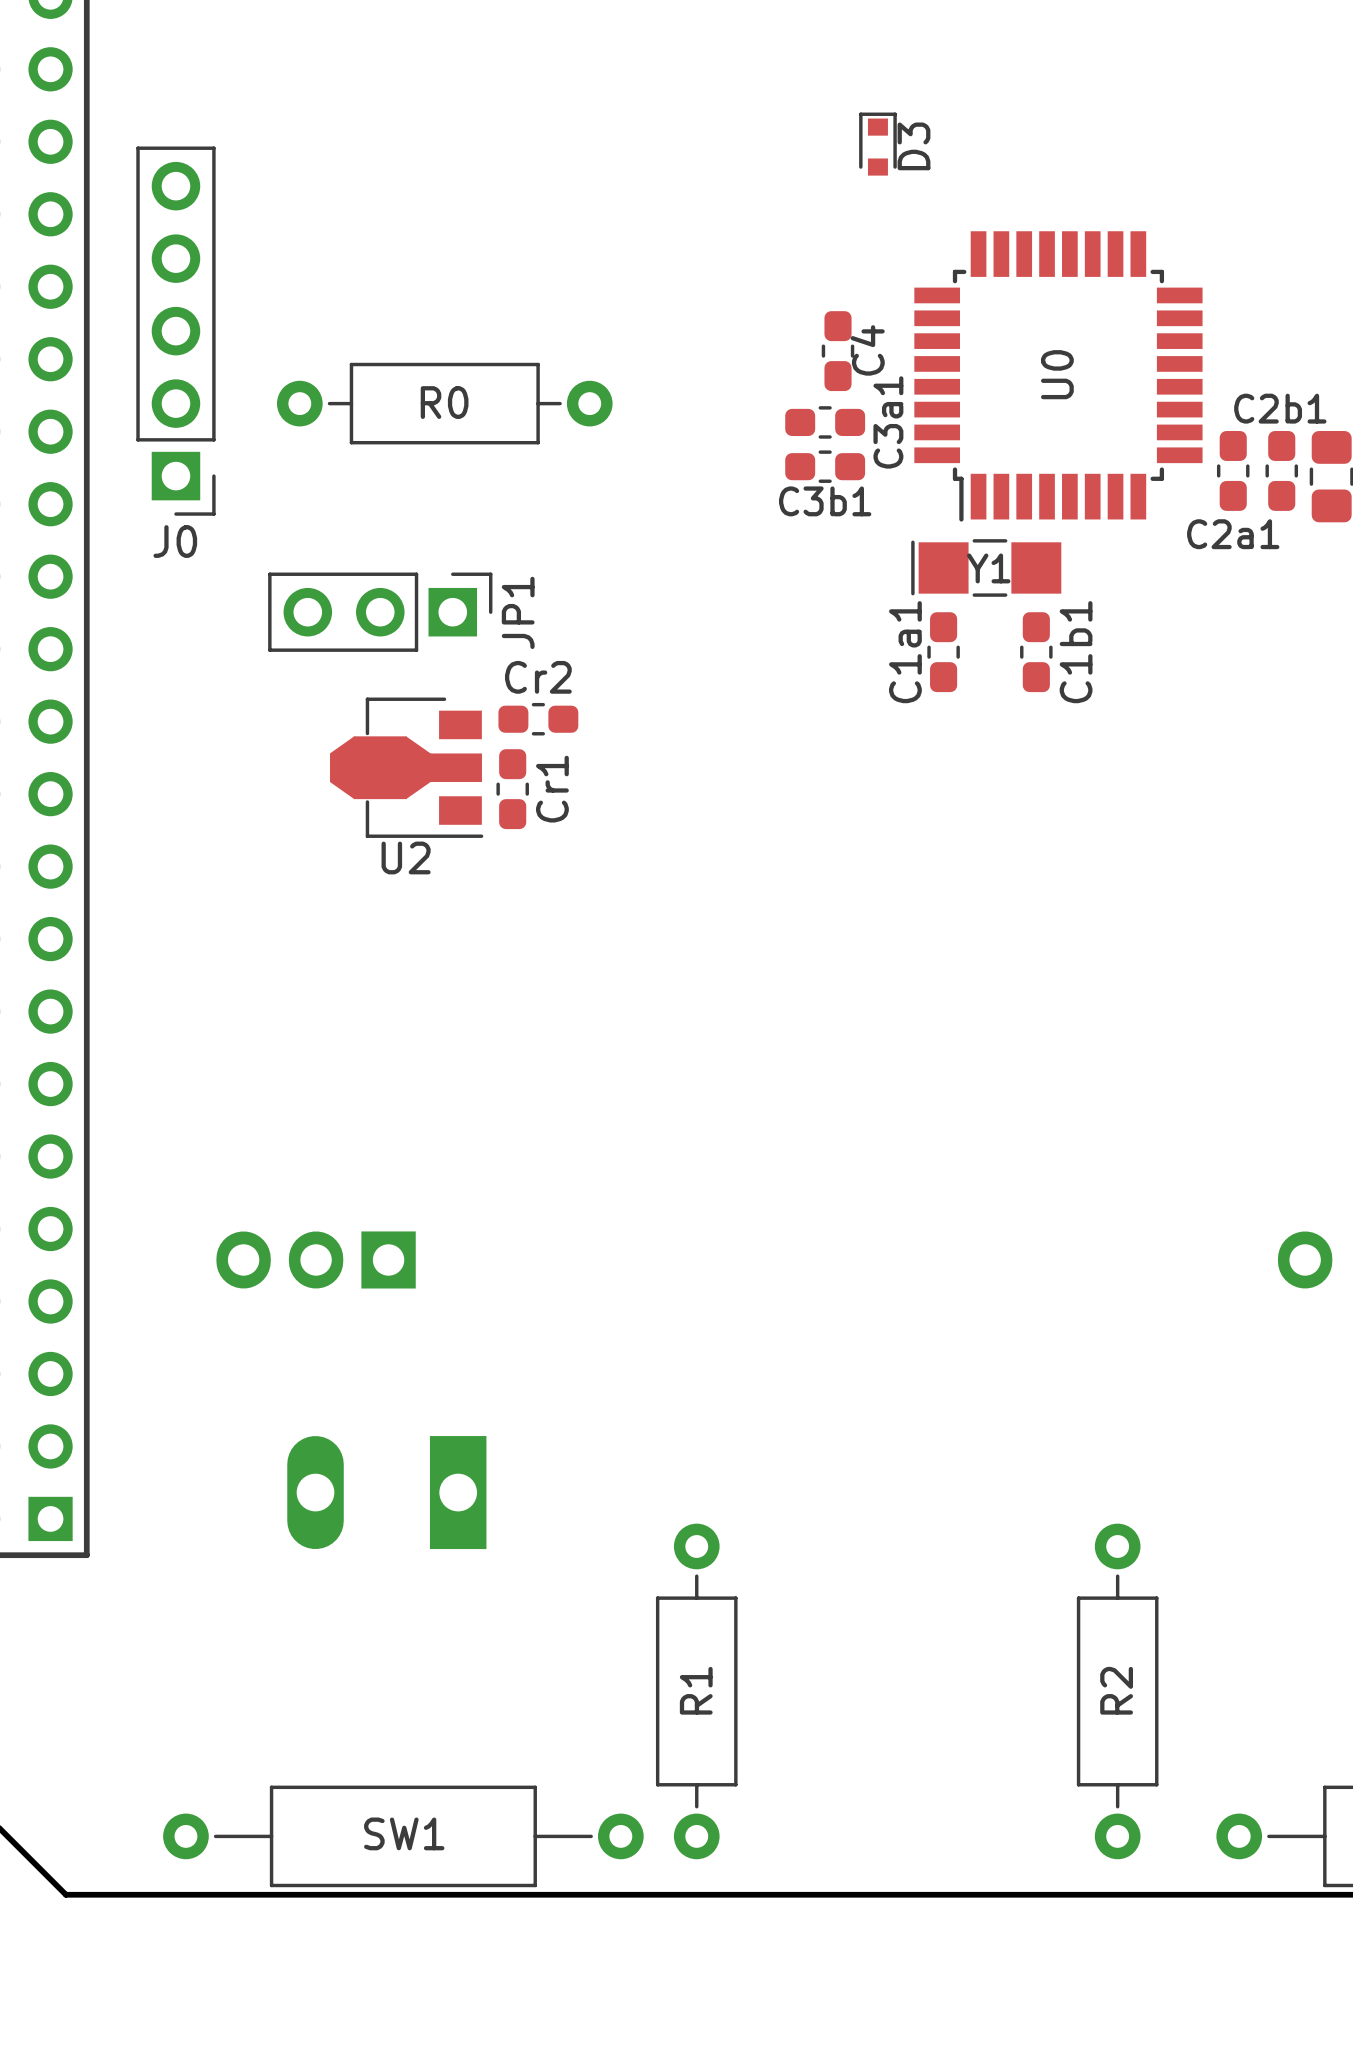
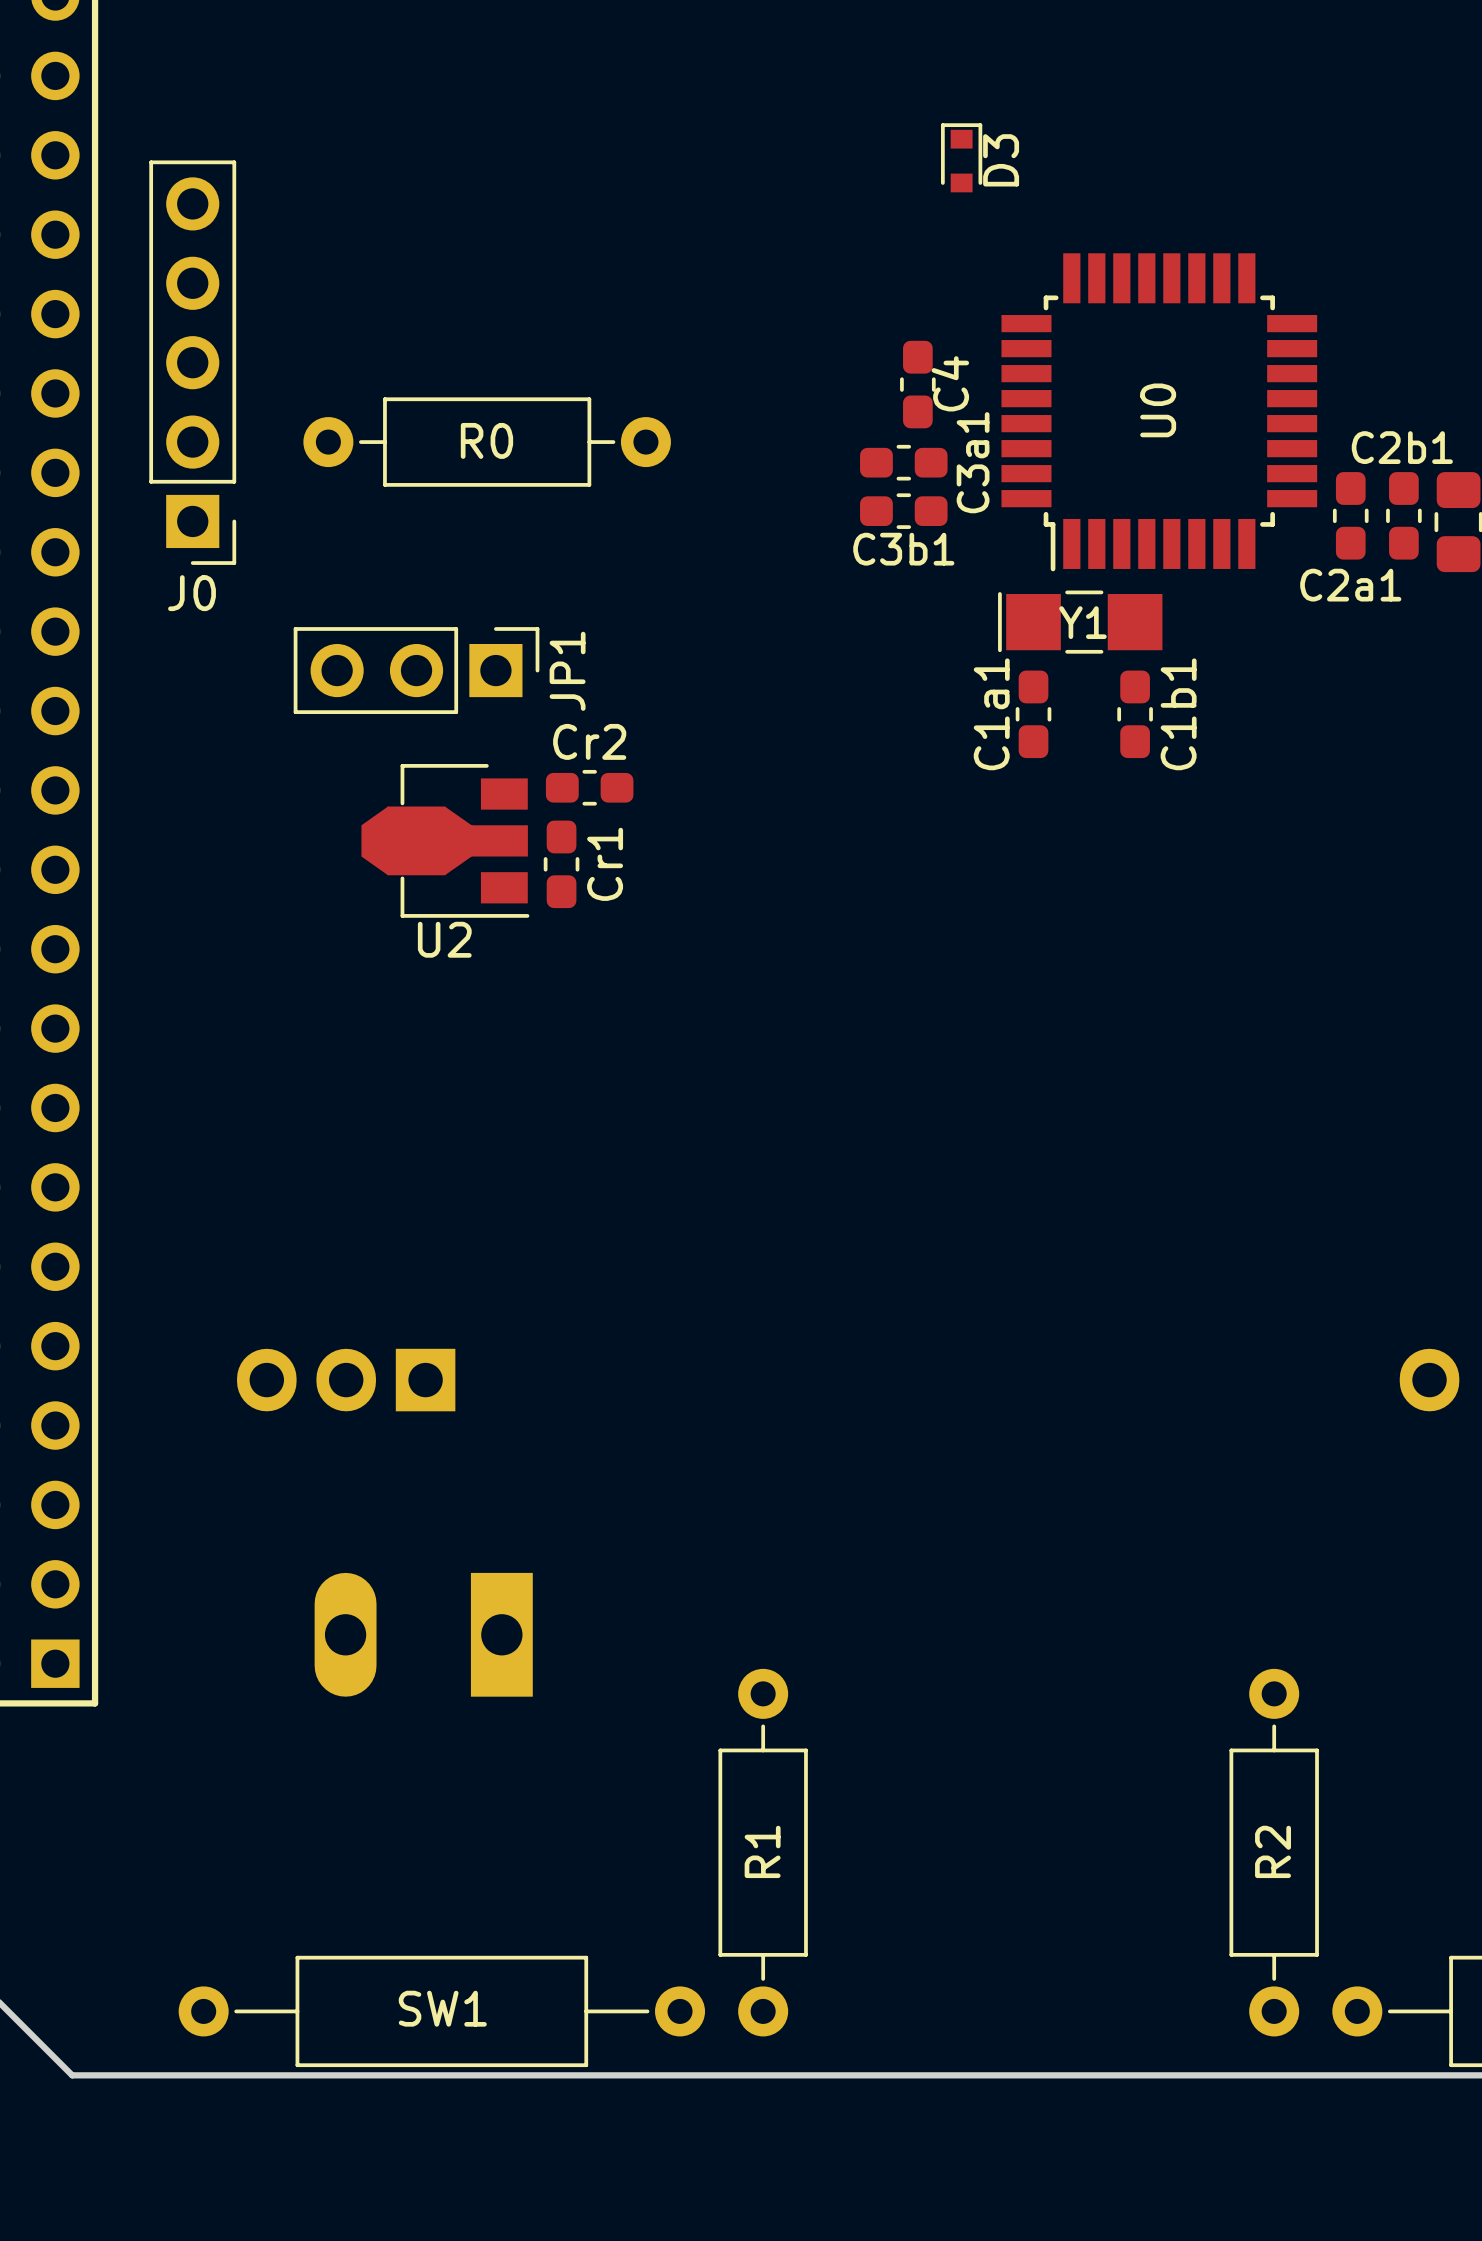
R2 position: (1117, 1691) -> (1274, 1852)

